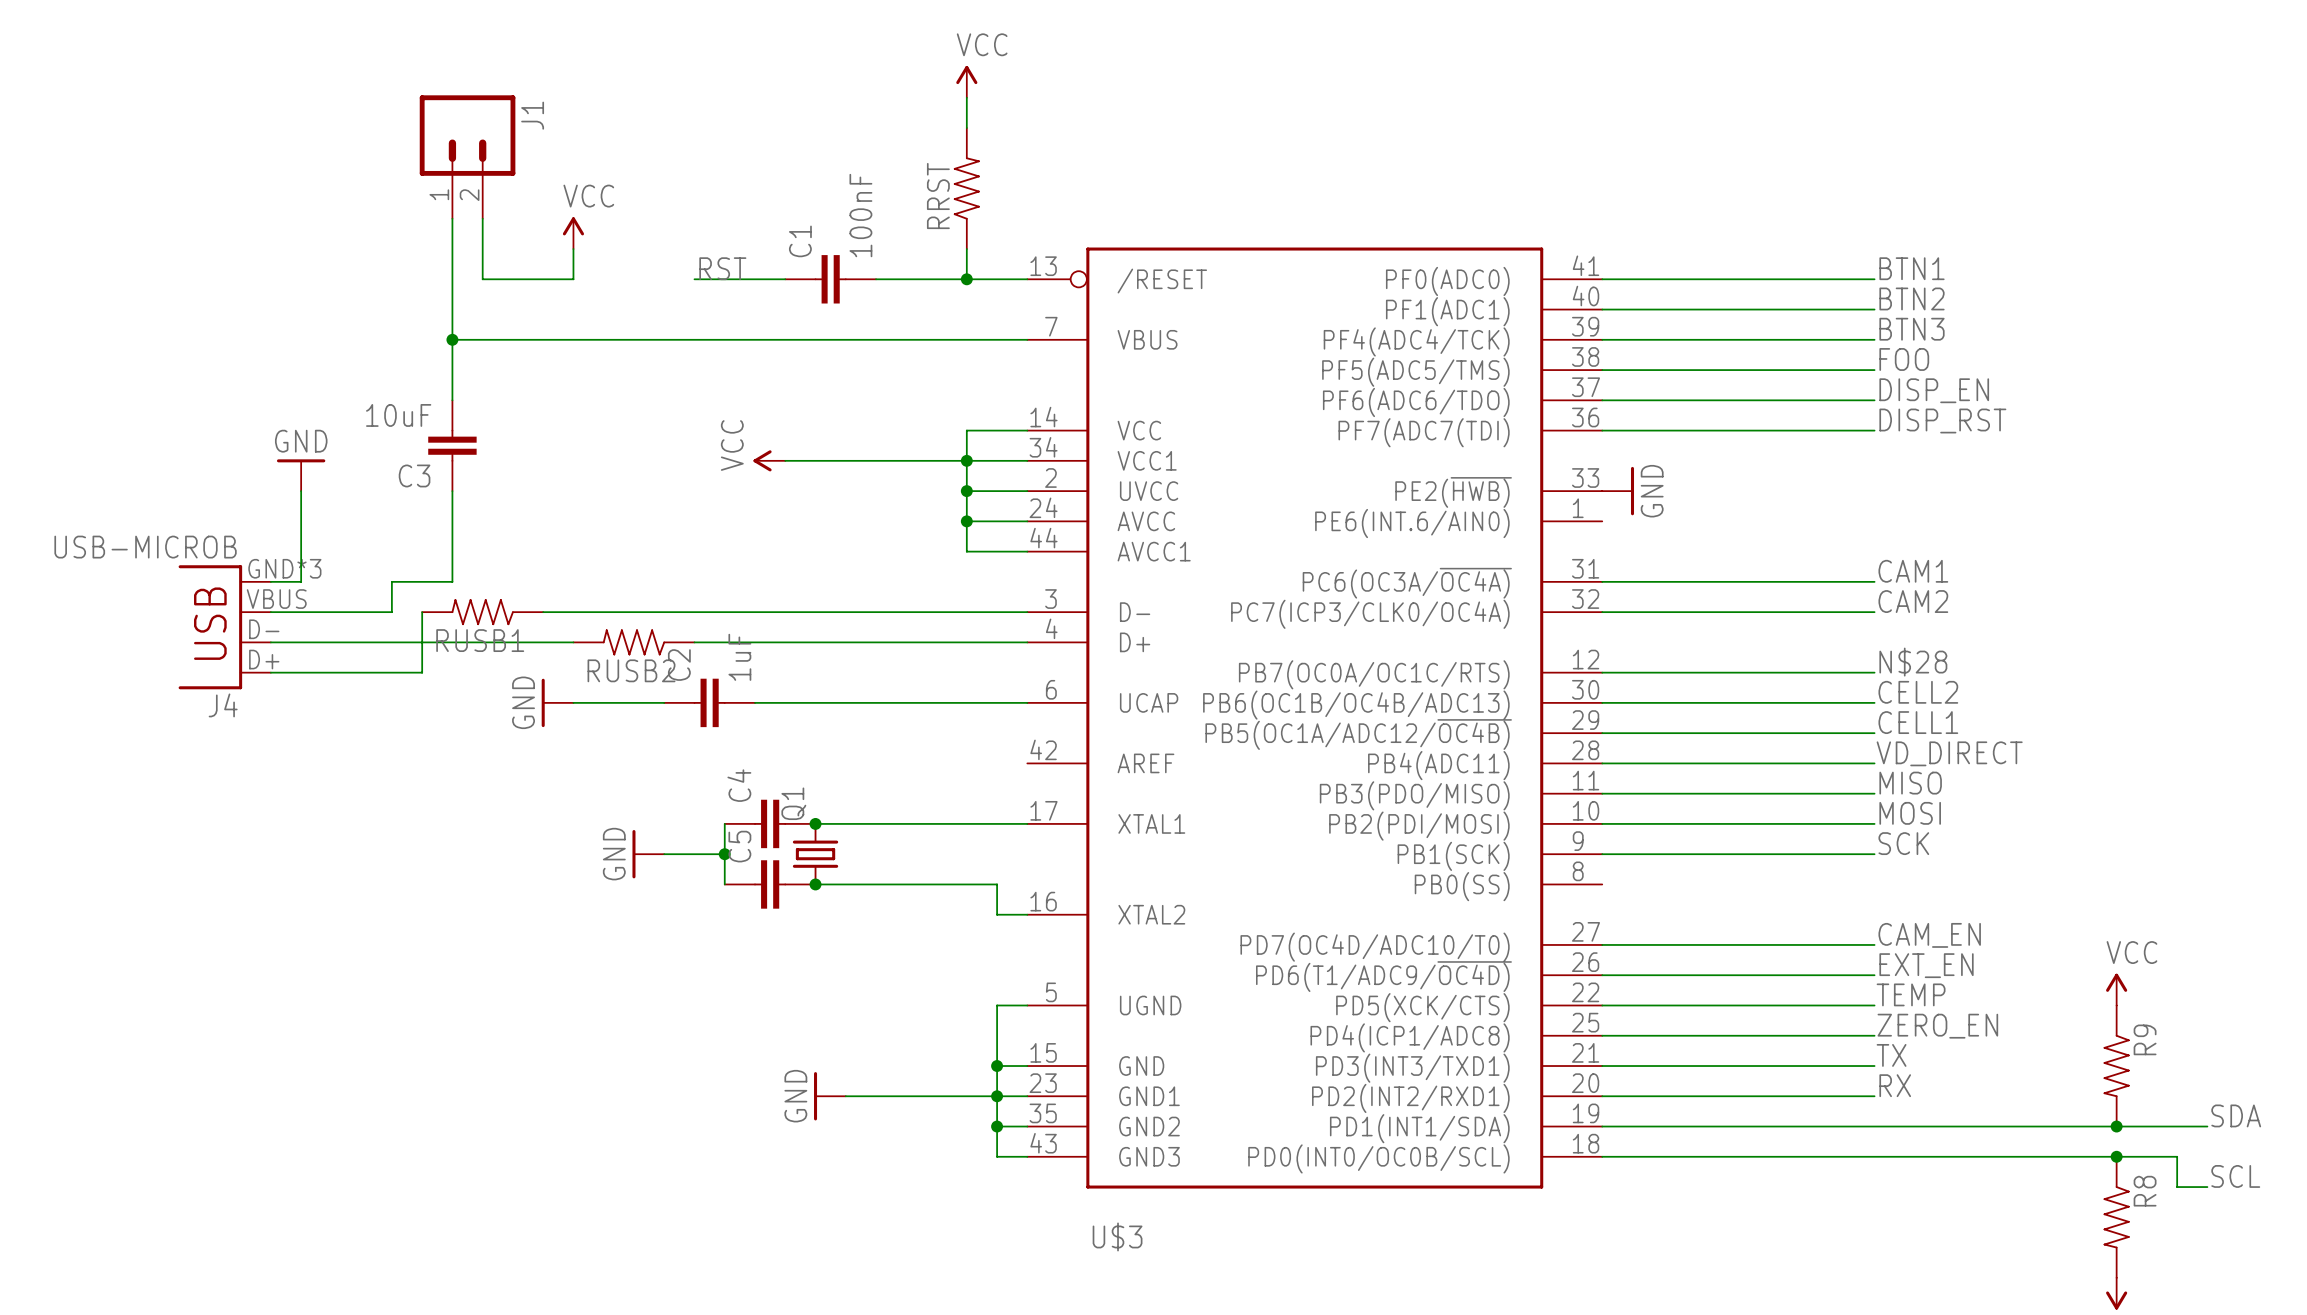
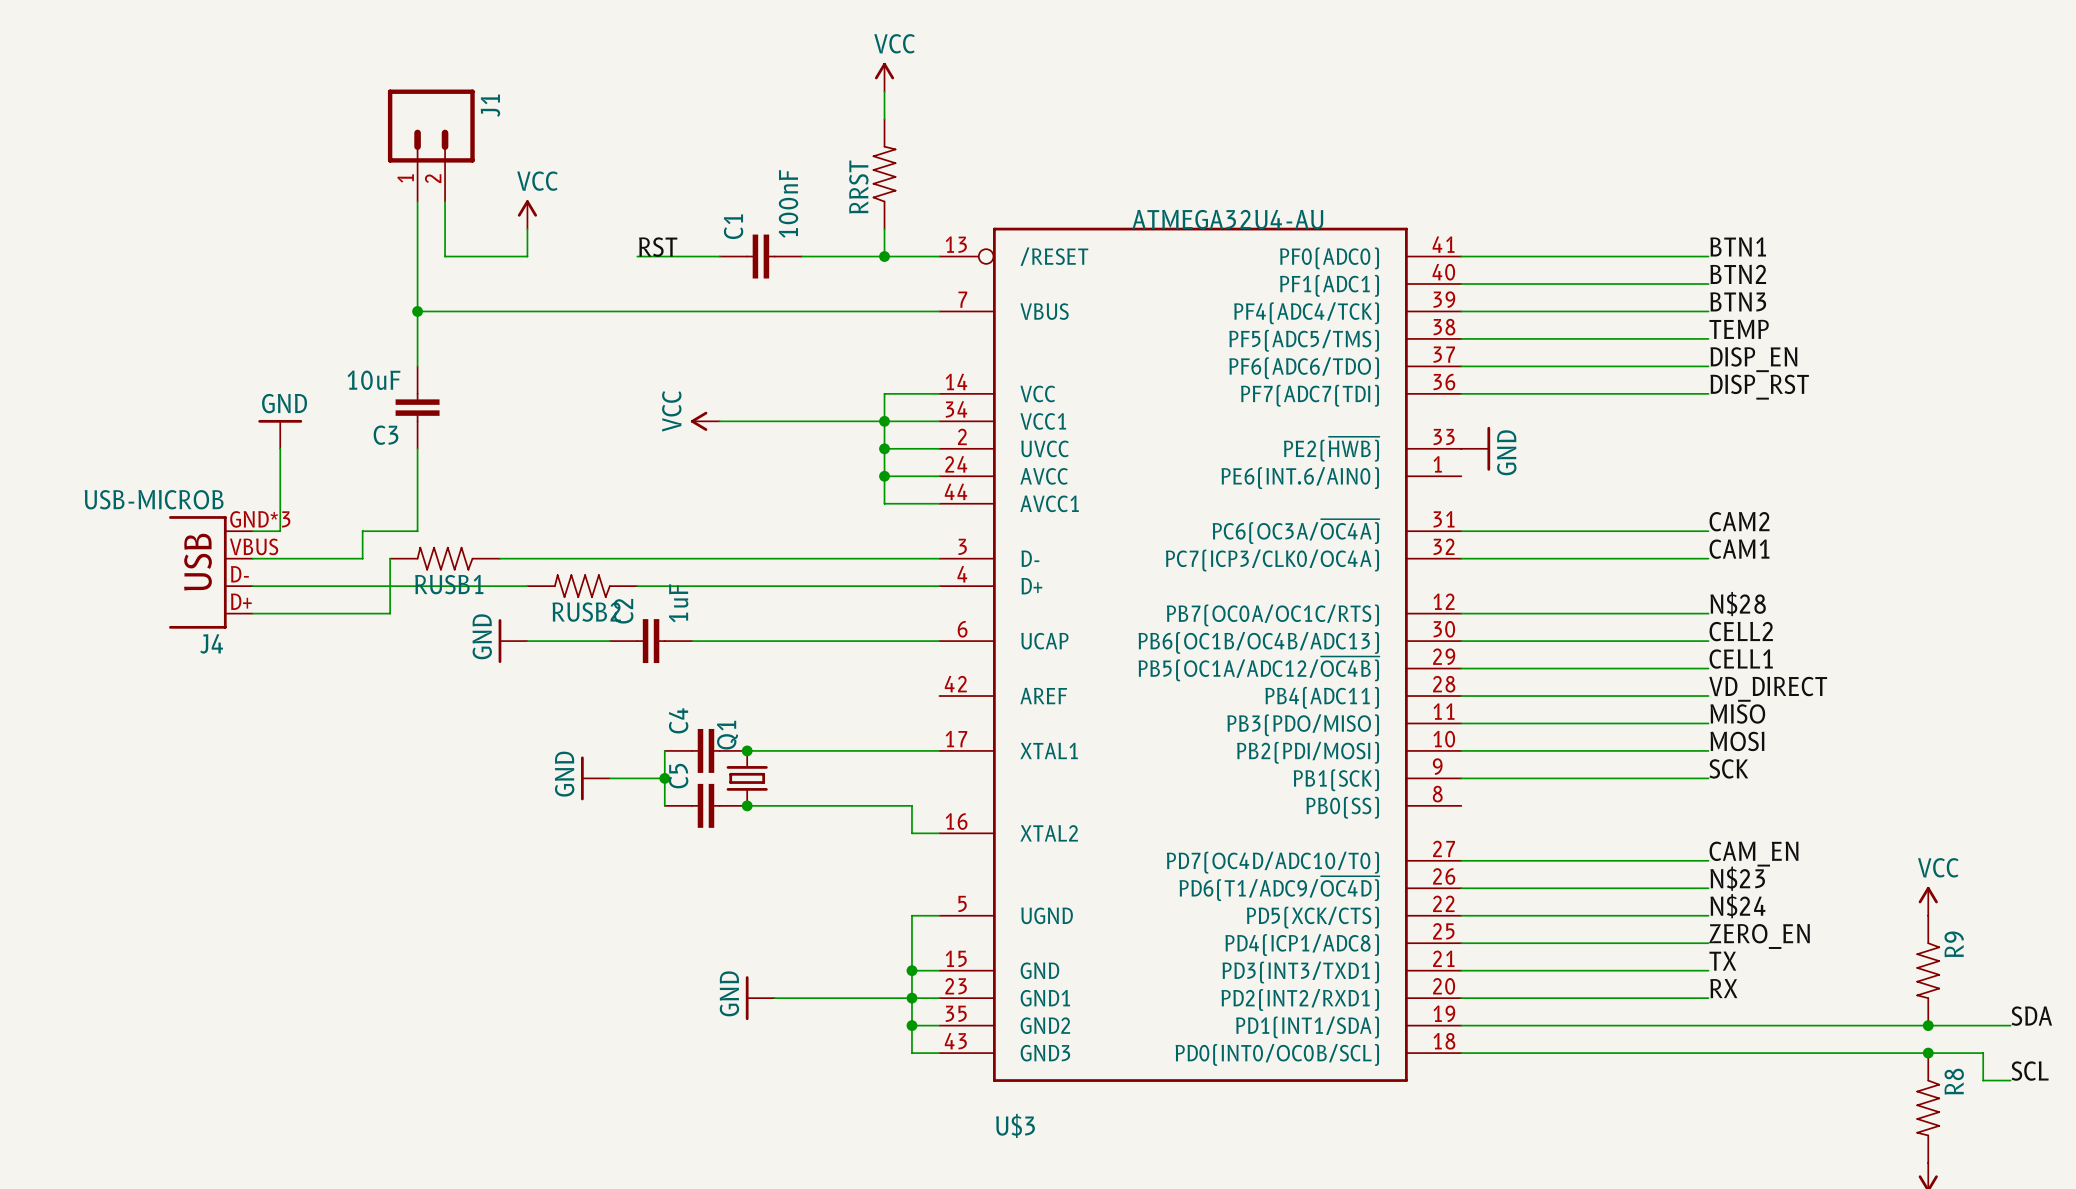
U$3 value: none -> ATMEGA32U4-AU (1227, 219)
label: FOO (1904, 359) -> TEMP (1739, 329)
label: CAM1 (1913, 571) -> CAM2 (1739, 521)
label: CAM2 (1913, 601) -> CAM1 (1739, 549)
label: EXT_EN (1926, 965) -> N$23 (1737, 878)
label: TEMP (1911, 994) -> N$24 (1737, 906)

